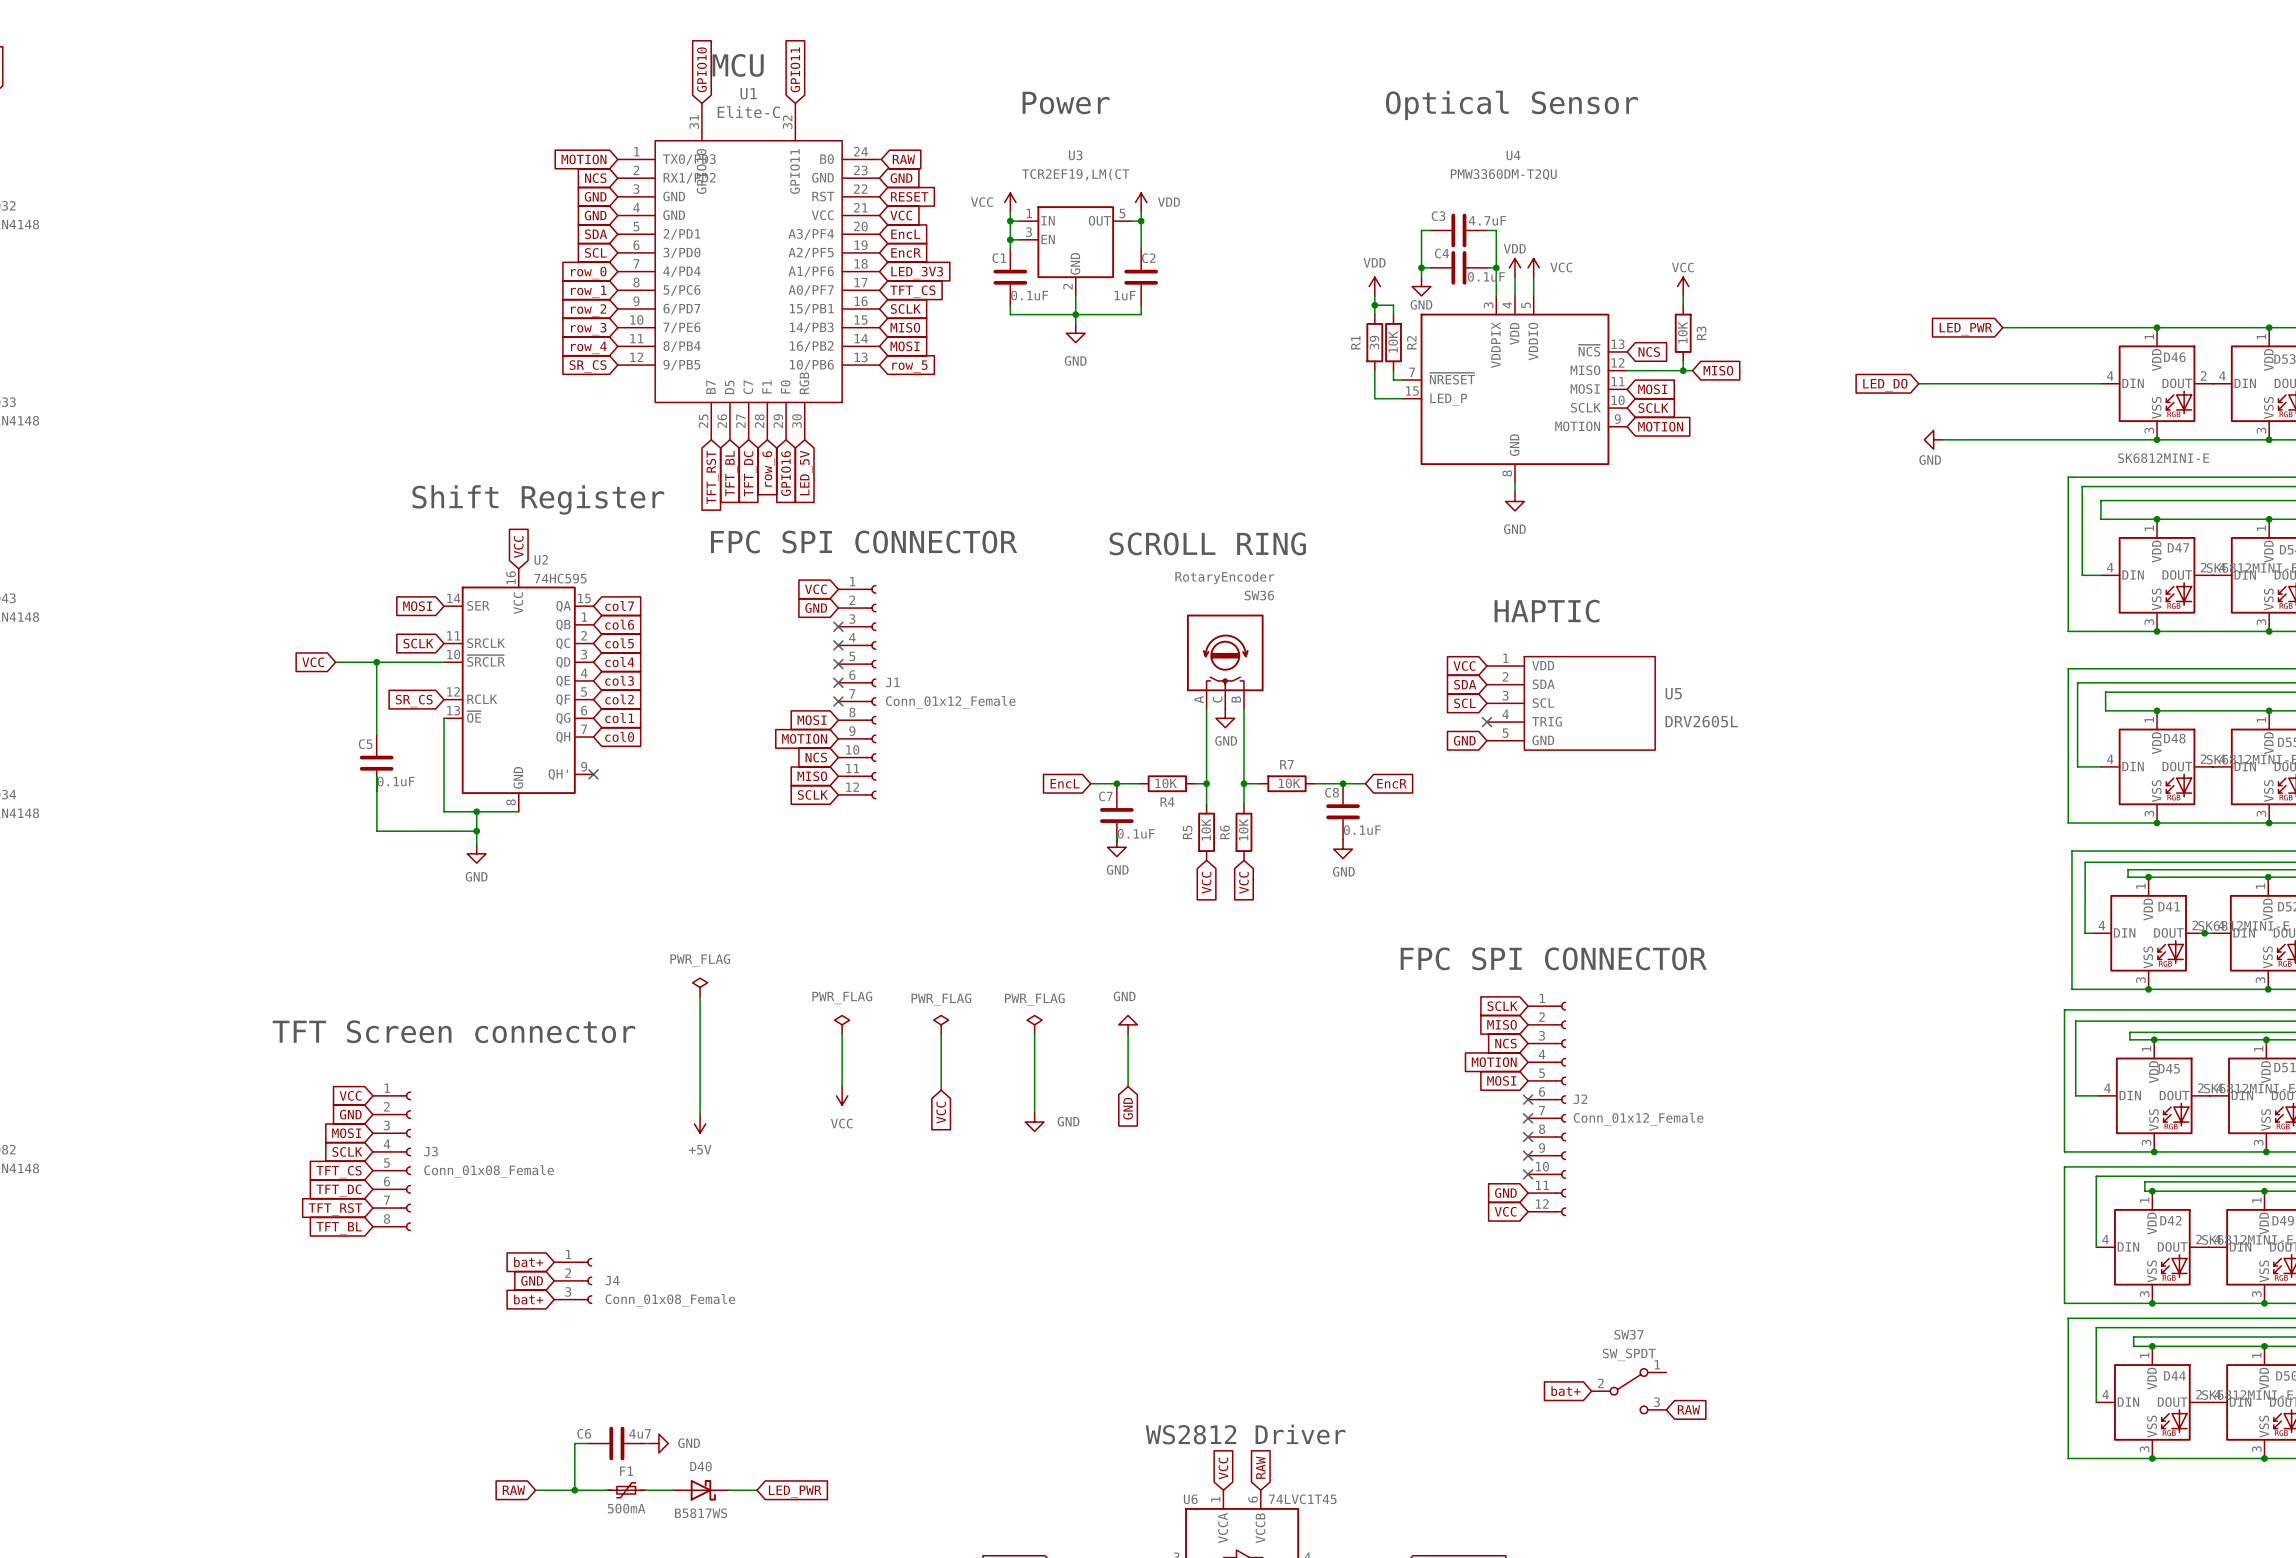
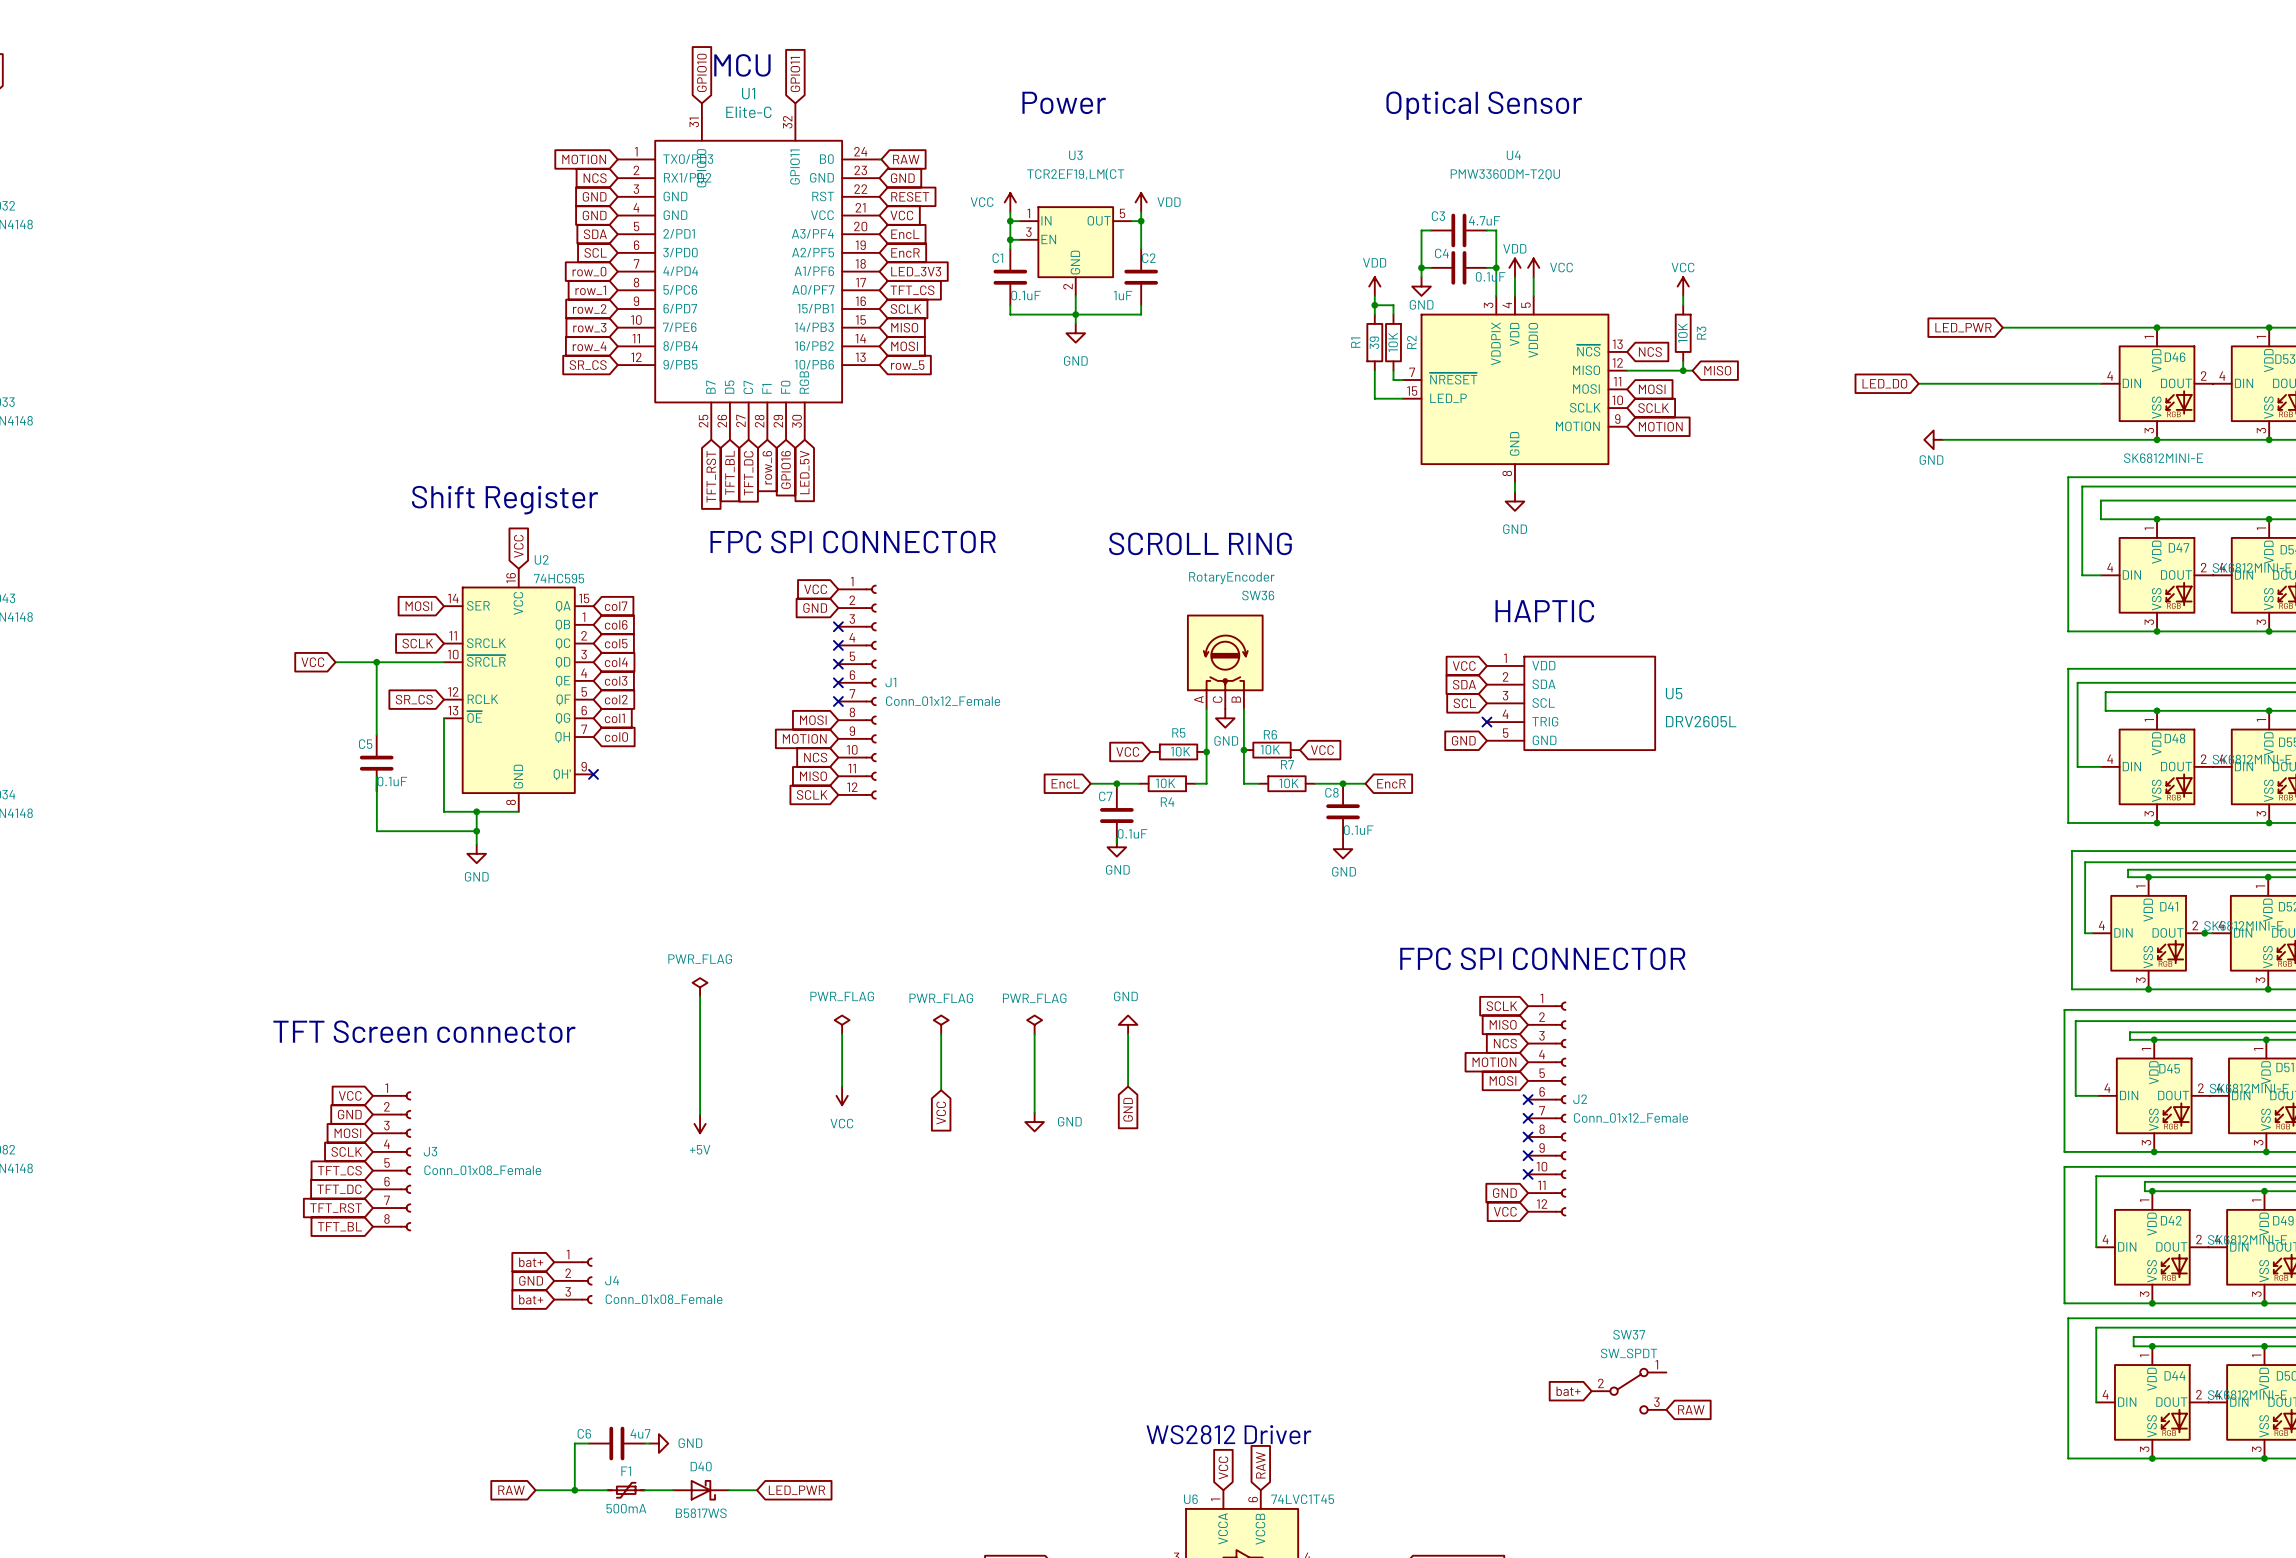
junction: none -> (1243, 750)
global label: none -> VCC (1322, 750)
global label: none -> VCC (1127, 751)
junction: none -> (1206, 751)
wire: (1206, 783) (1206, 804) -> none
junction: (1206, 783) -> none
wire: (1243, 783) (1243, 804) -> none
junction: (1243, 783) -> none
R5 rotation: 0° (1206, 832) -> 90° clockwise (1178, 751)
R5 position: (1206, 832) -> (1178, 751)
R6 rotation: 0° (1243, 832) -> 90° clockwise (1272, 750)
R6 position: (1243, 832) -> (1272, 750)
global label: VCC (1206, 882) -> none
global label: VCC (1243, 882) -> none

